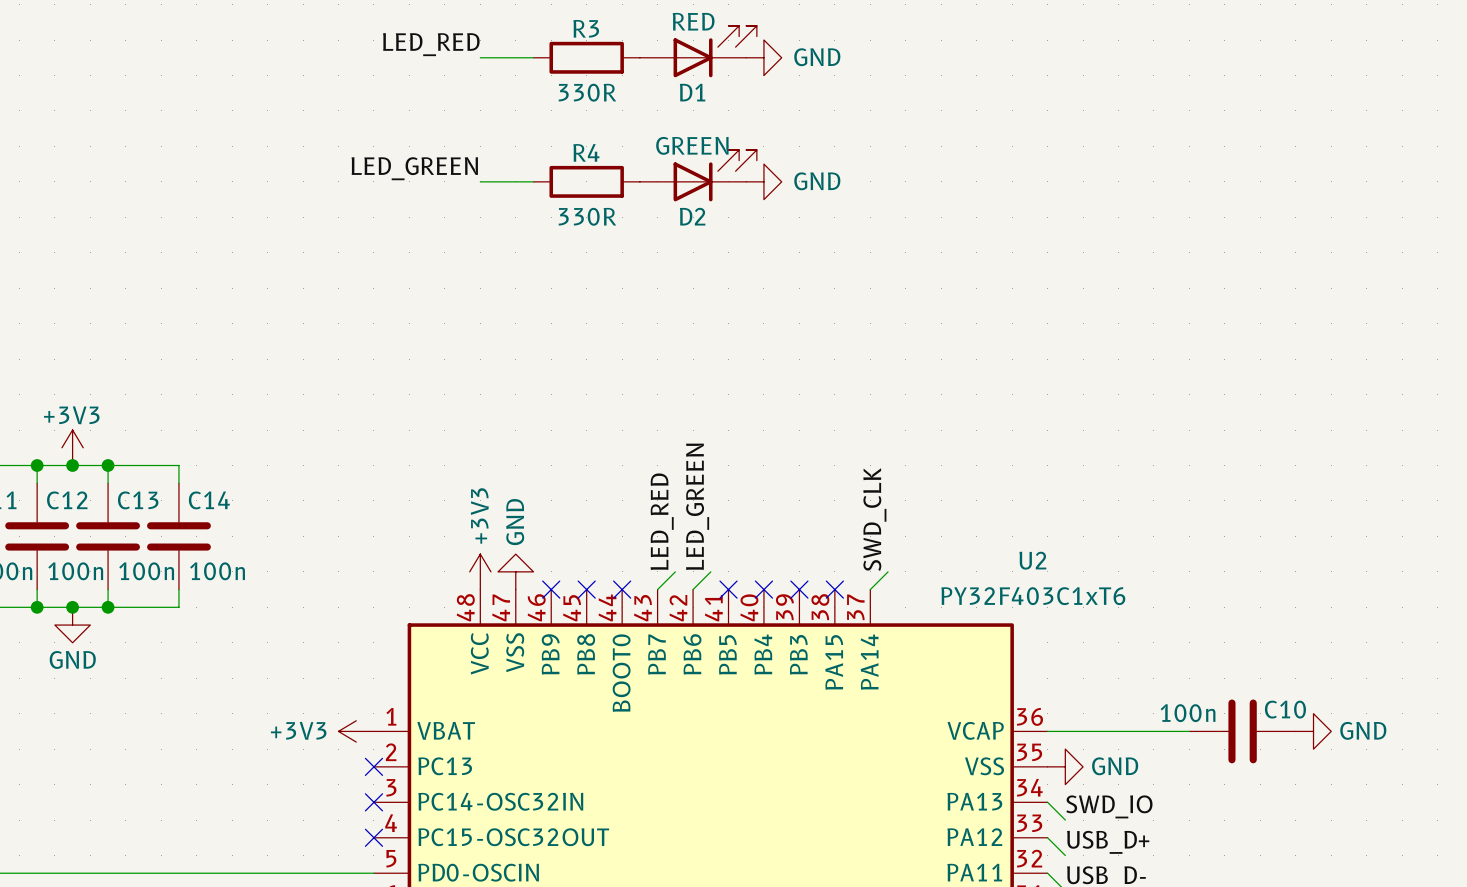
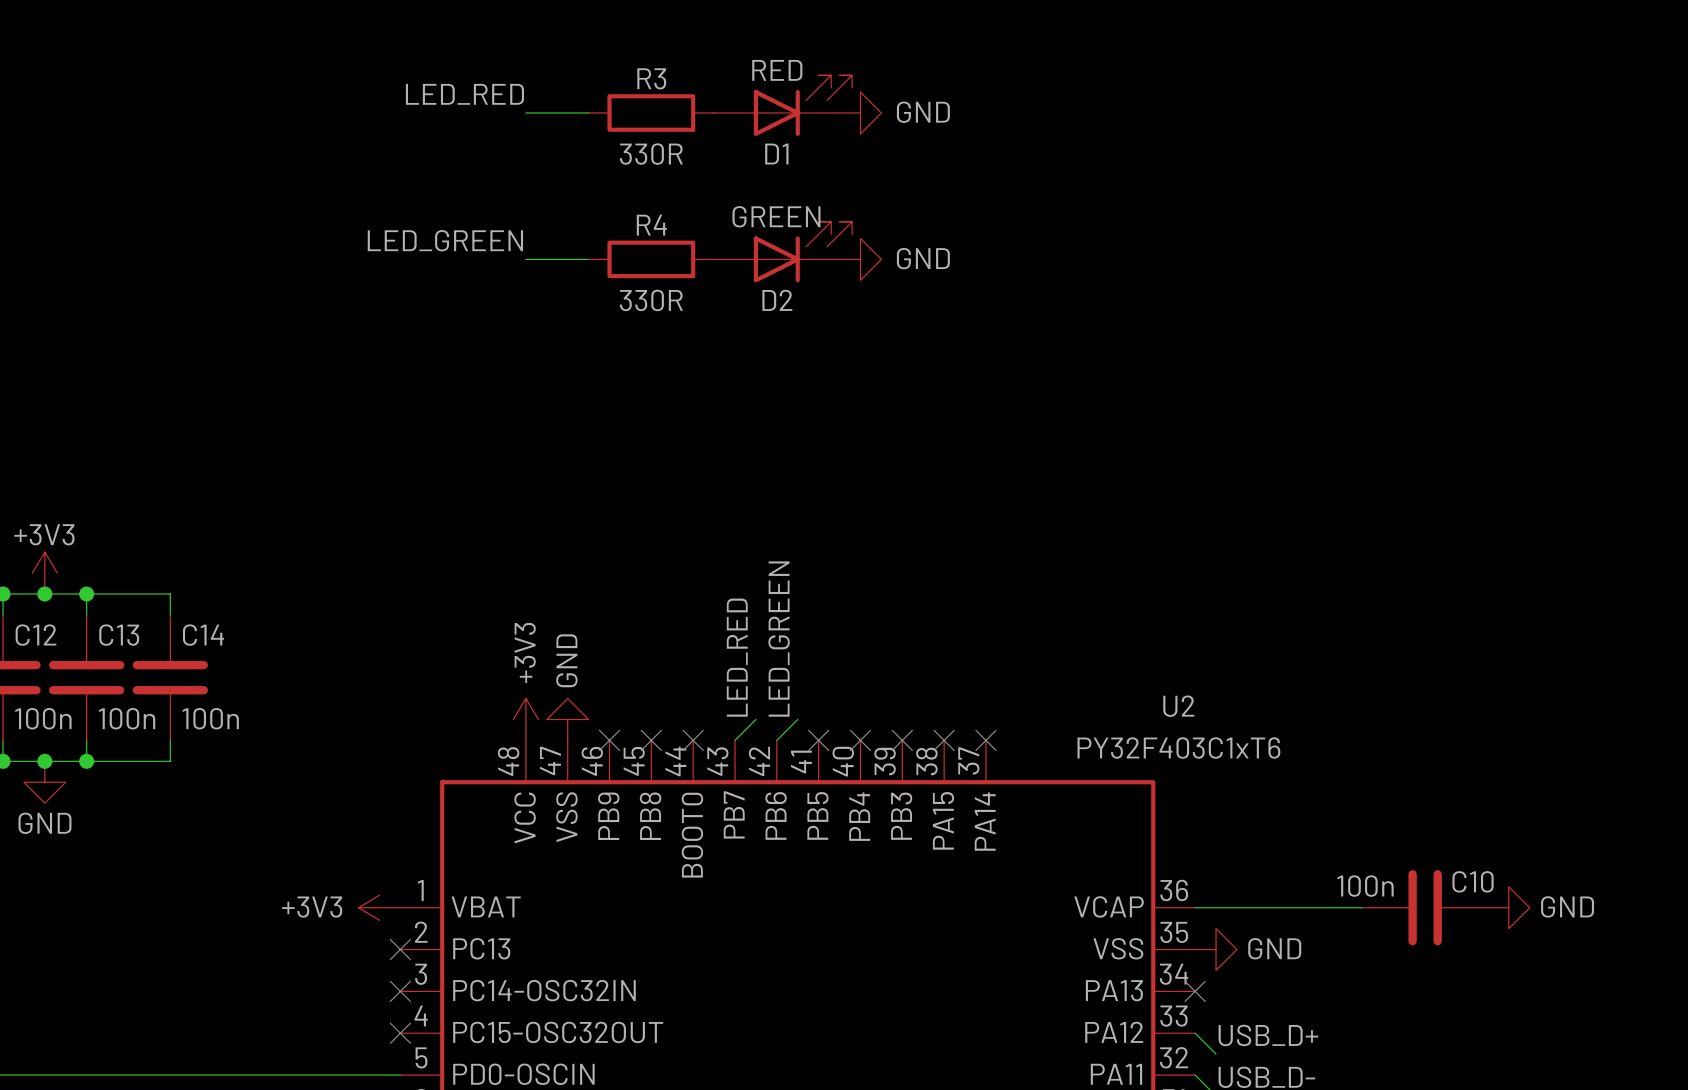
label: SWD_CLK (874, 519) -> none
wire: (888, 571) (870, 589) -> none
no-connect mark: none -> (985, 740)
wire: (1047, 802) (1065, 820) -> none
no-connect mark: none -> (1195, 991)
label: SWD_IO (1109, 806) -> none

